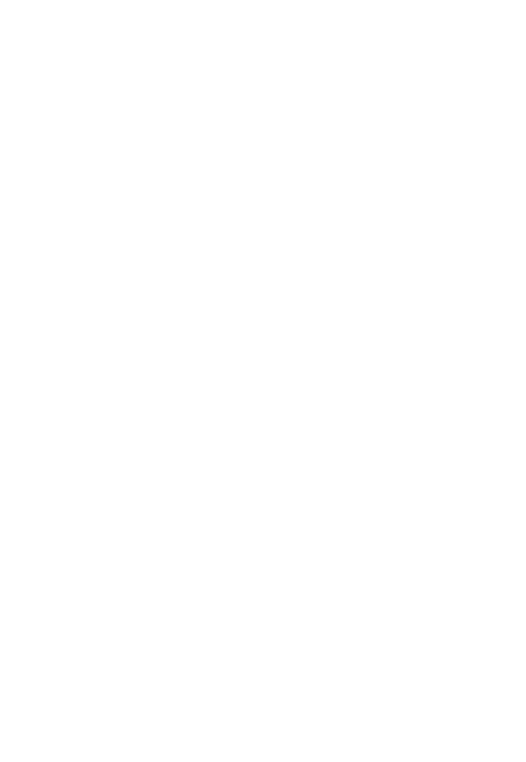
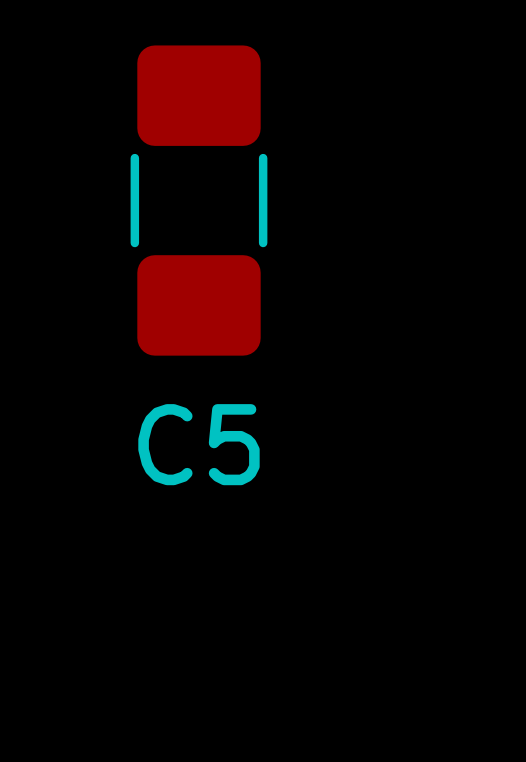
C5: none -> (198, 200)

